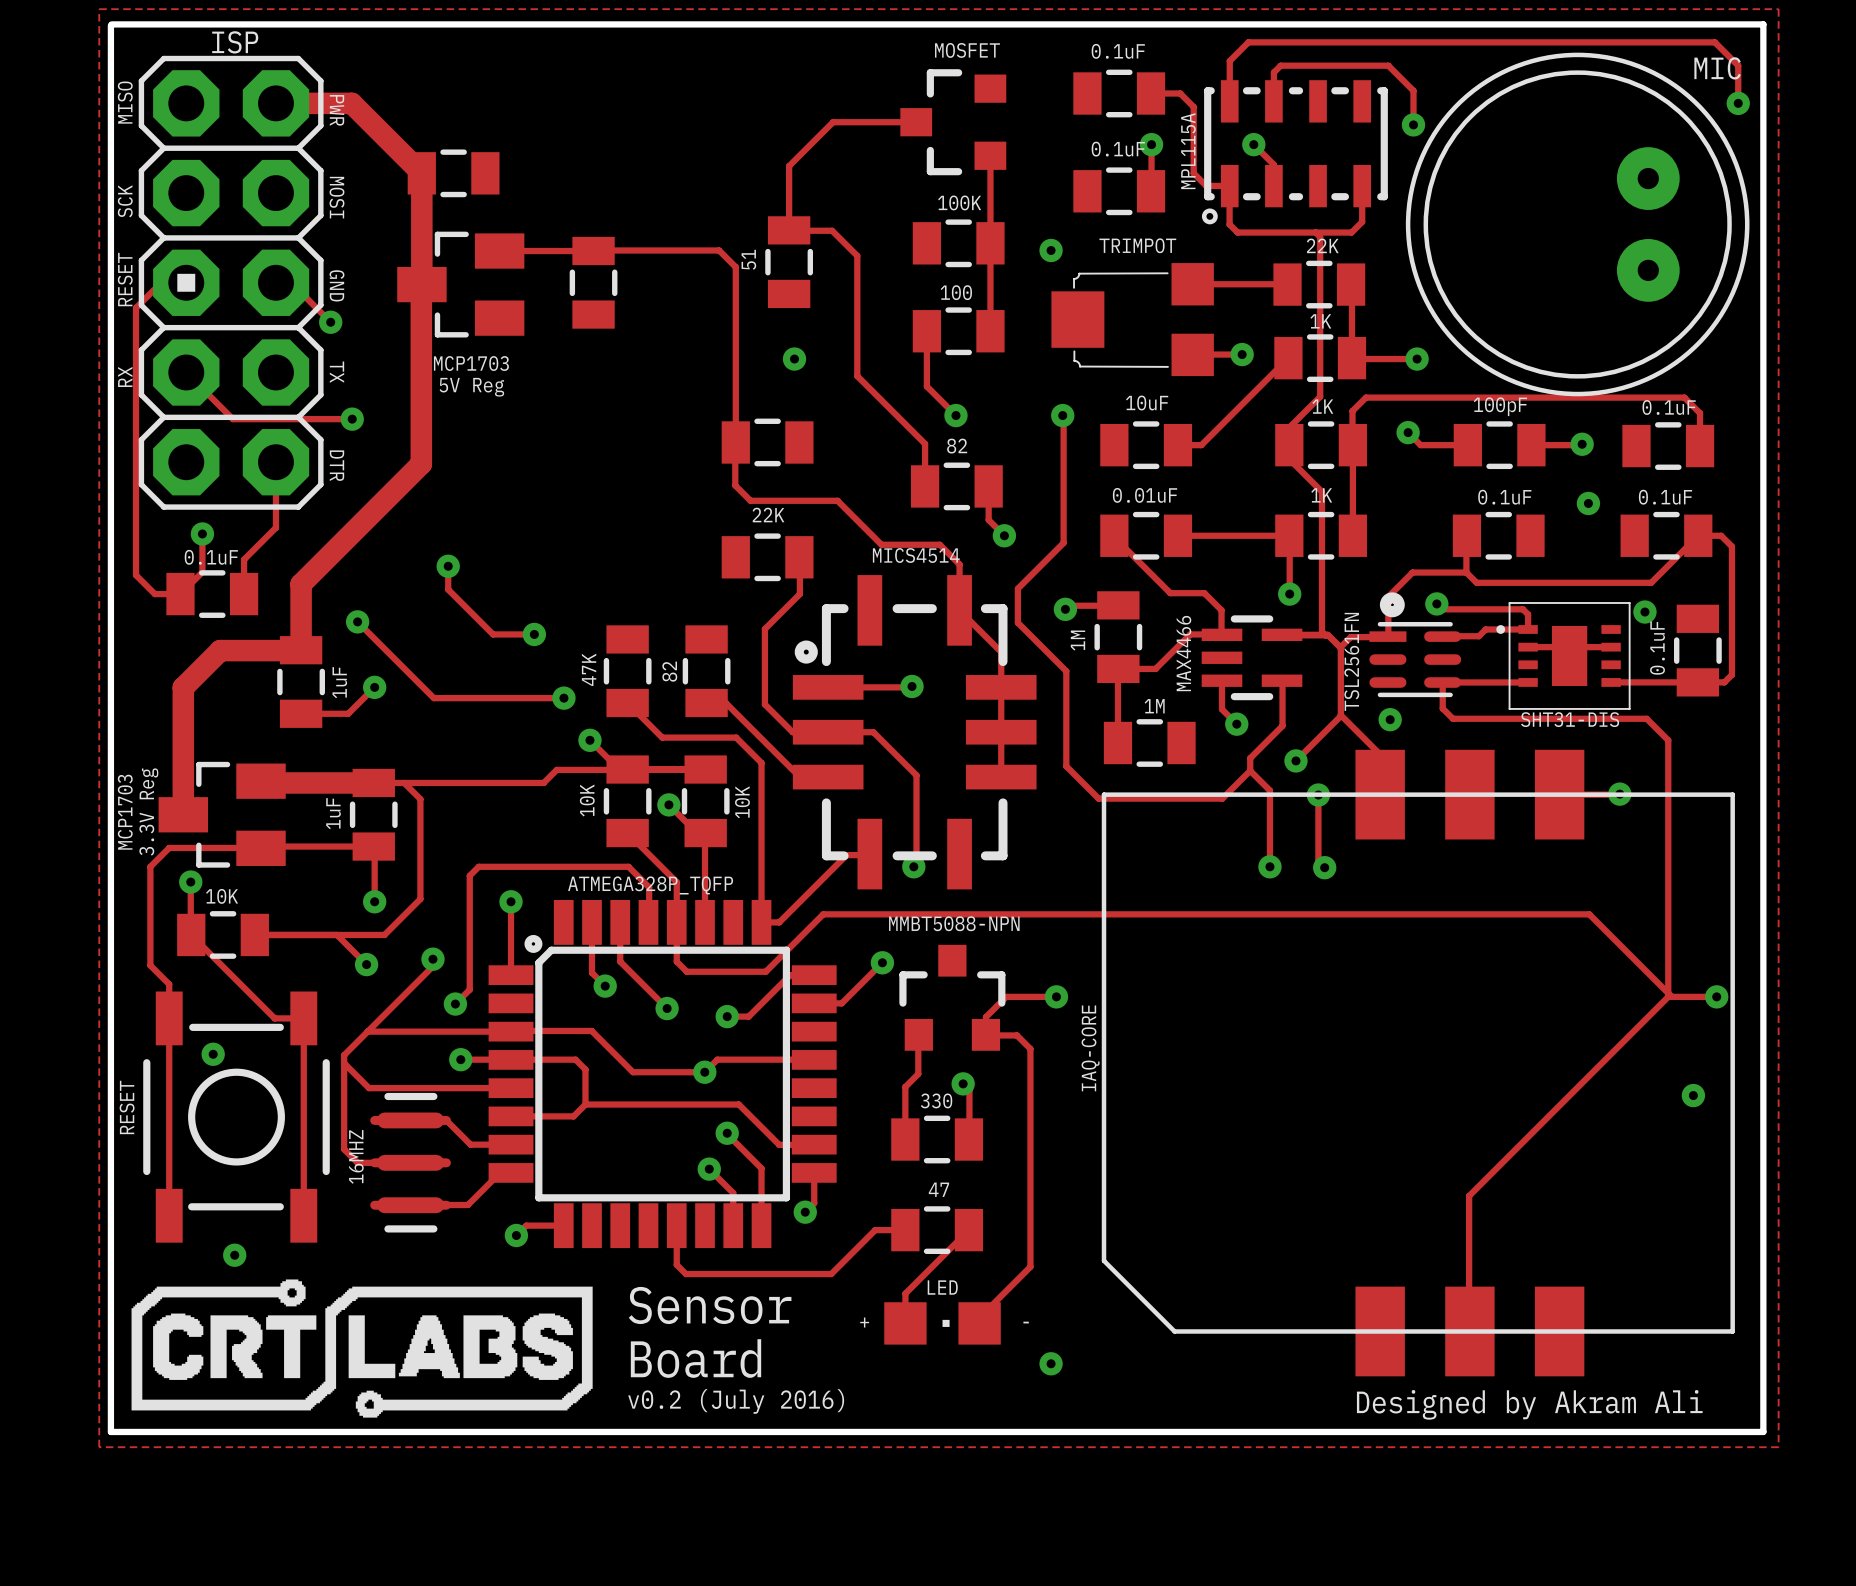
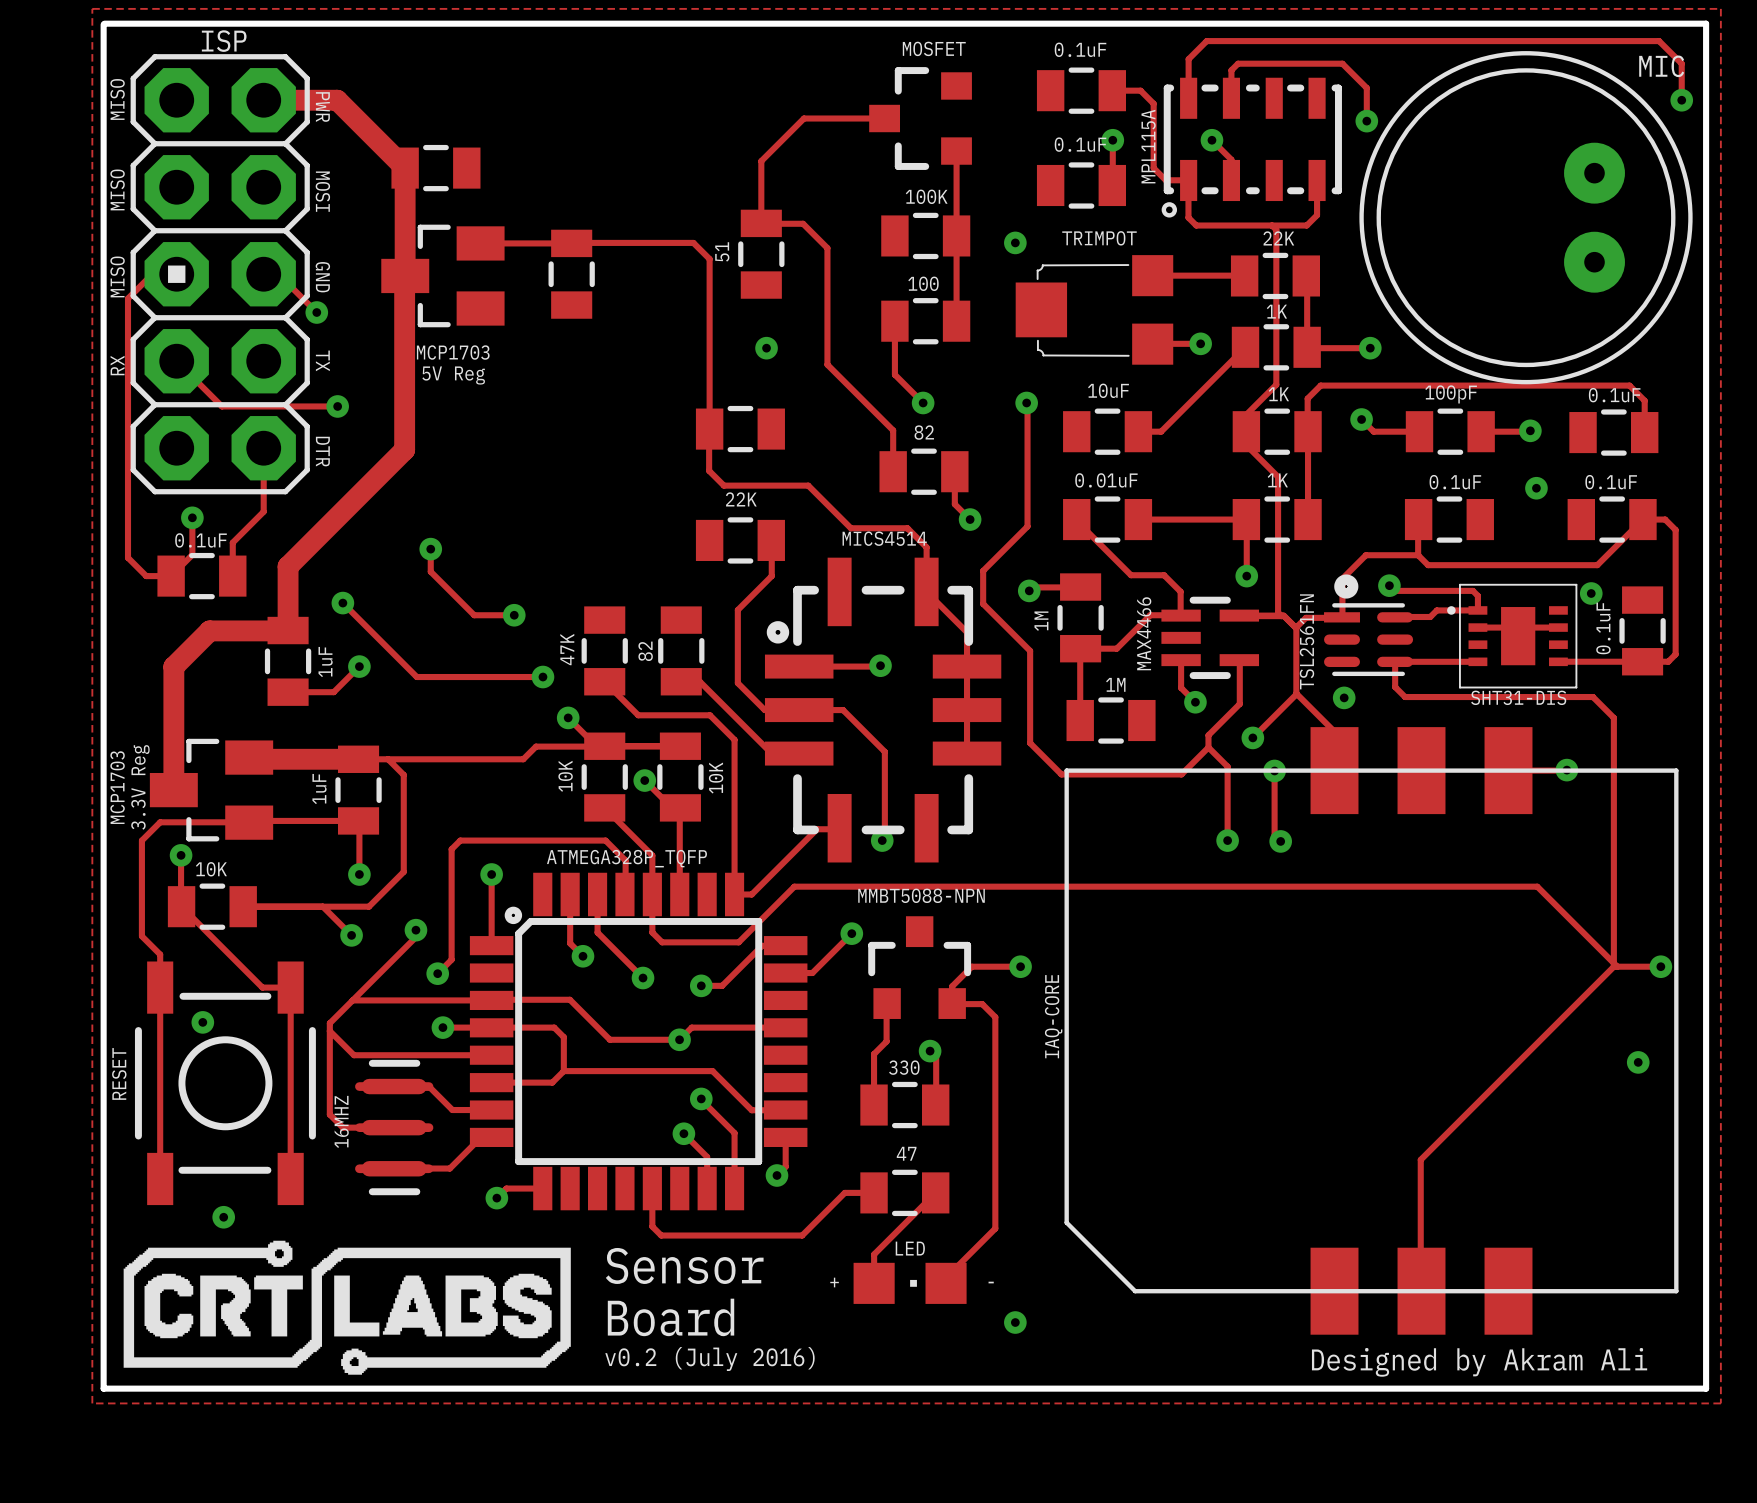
text: SCK (125, 201) -> MISO (117, 189)
text: RESET (125, 279) -> MISO (117, 276)

